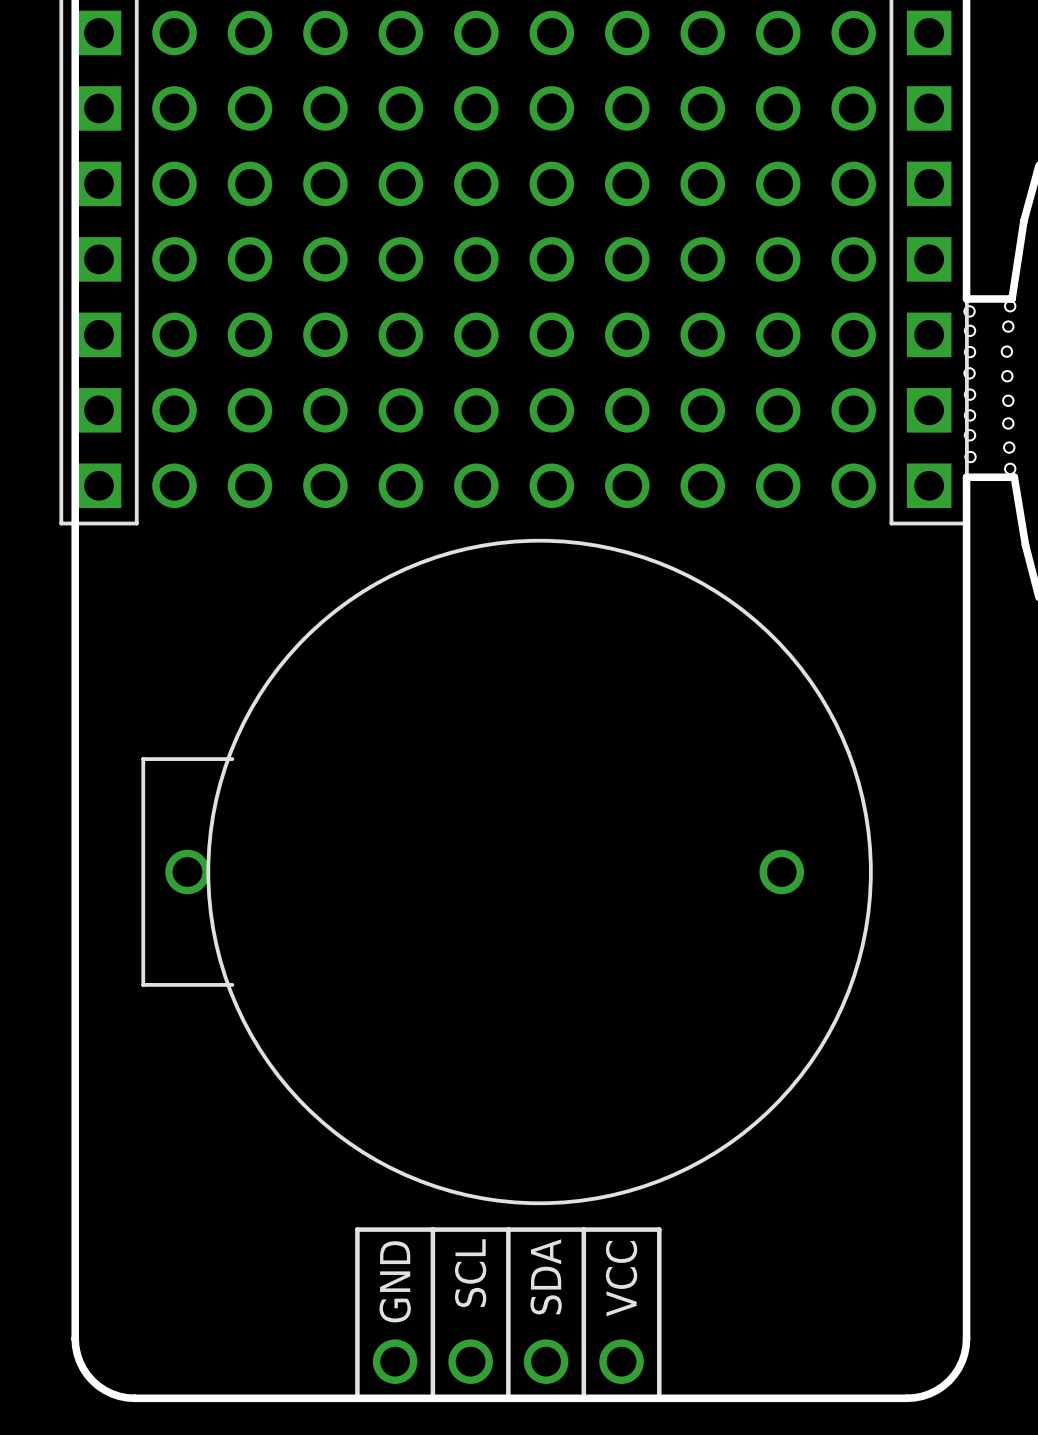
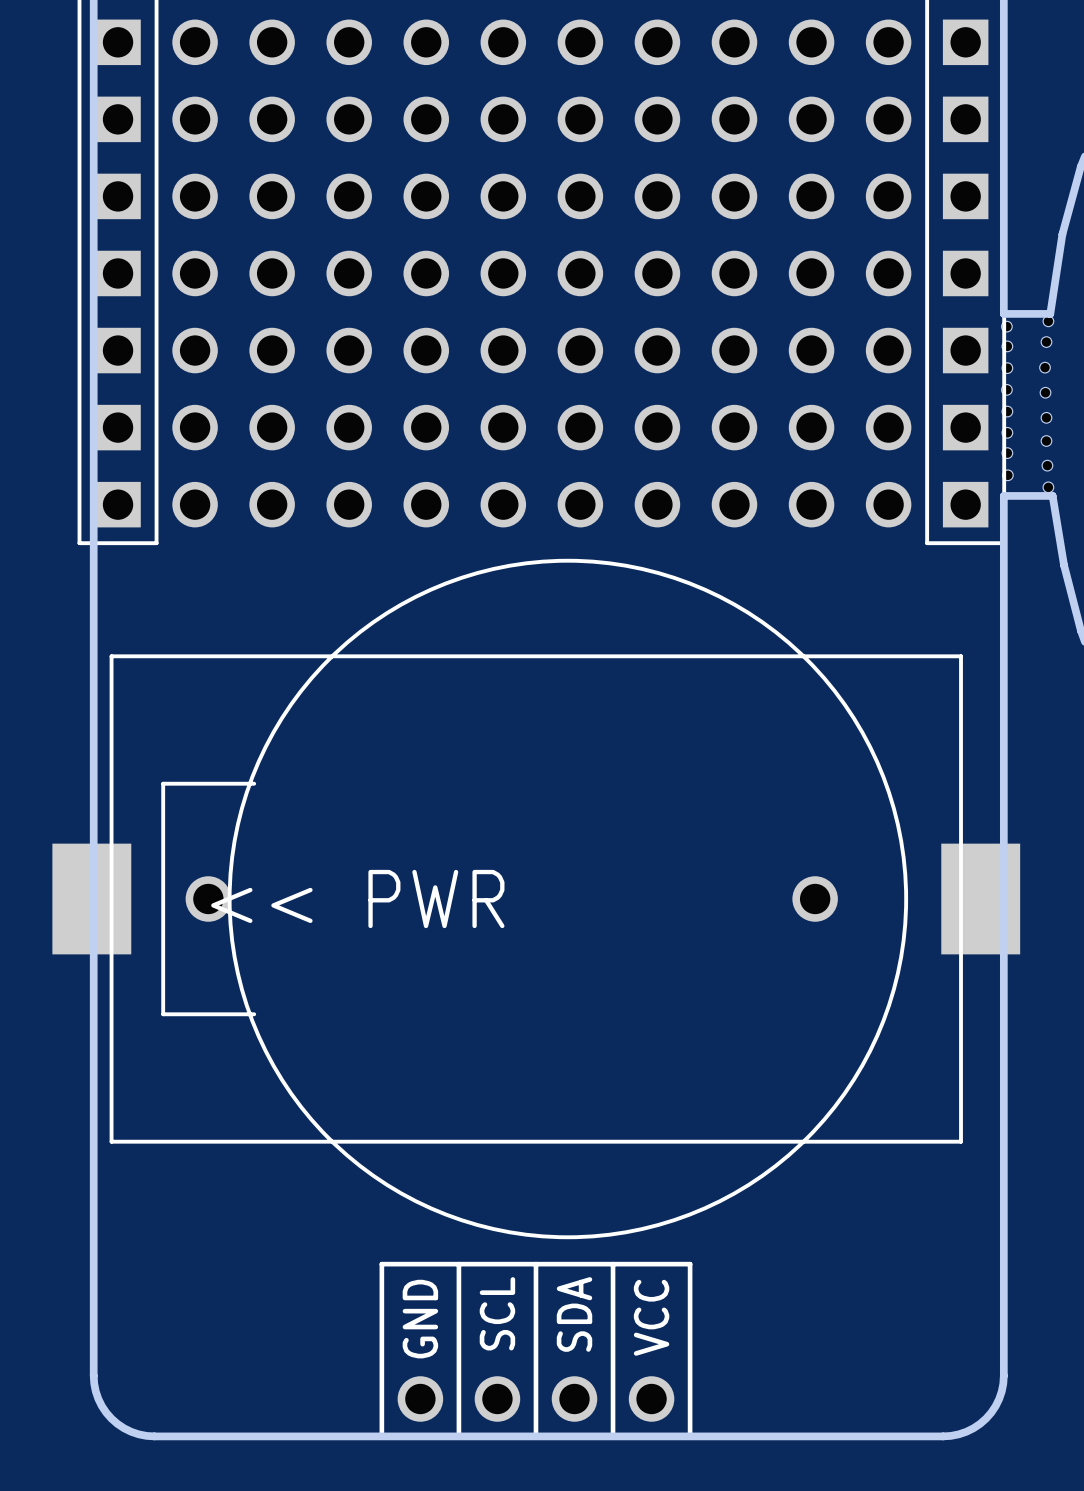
part: none -> (536, 899)

